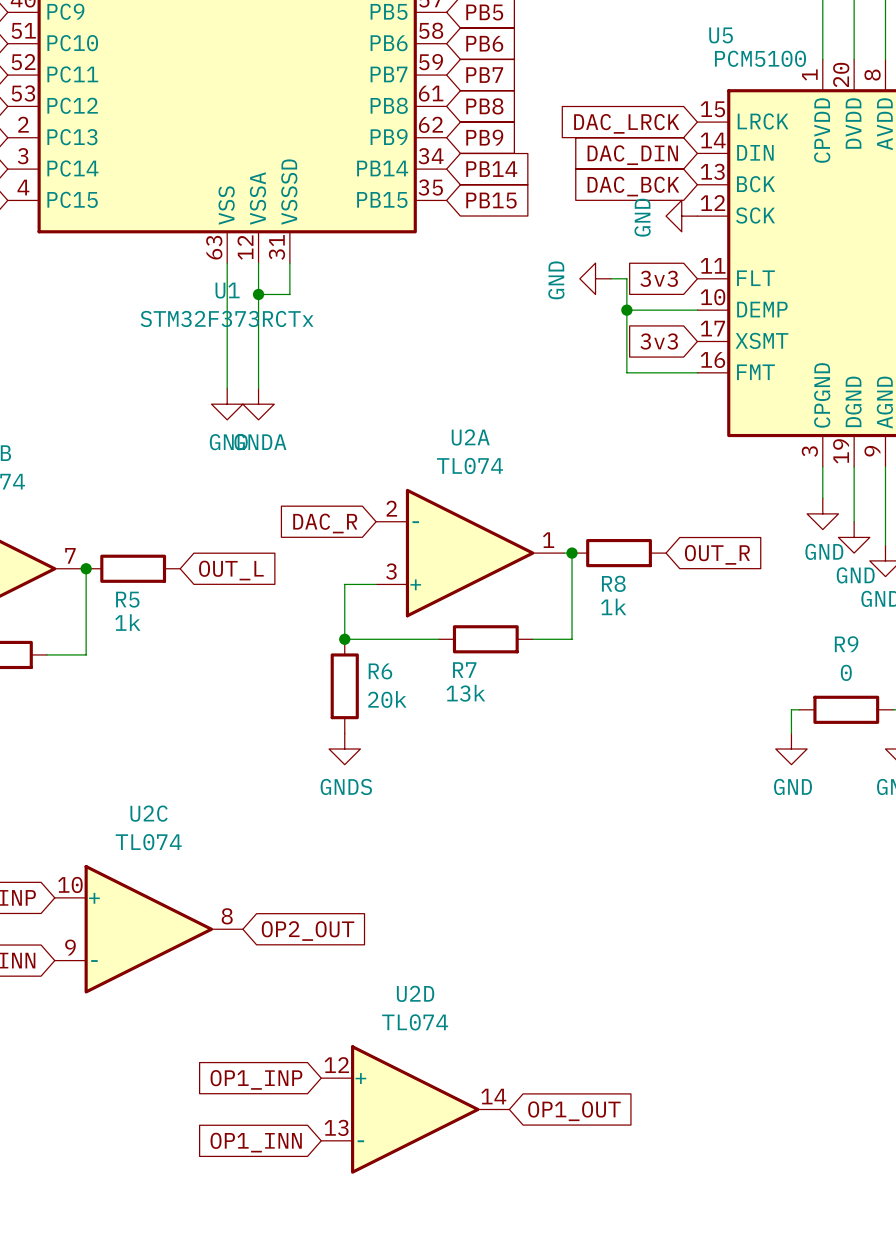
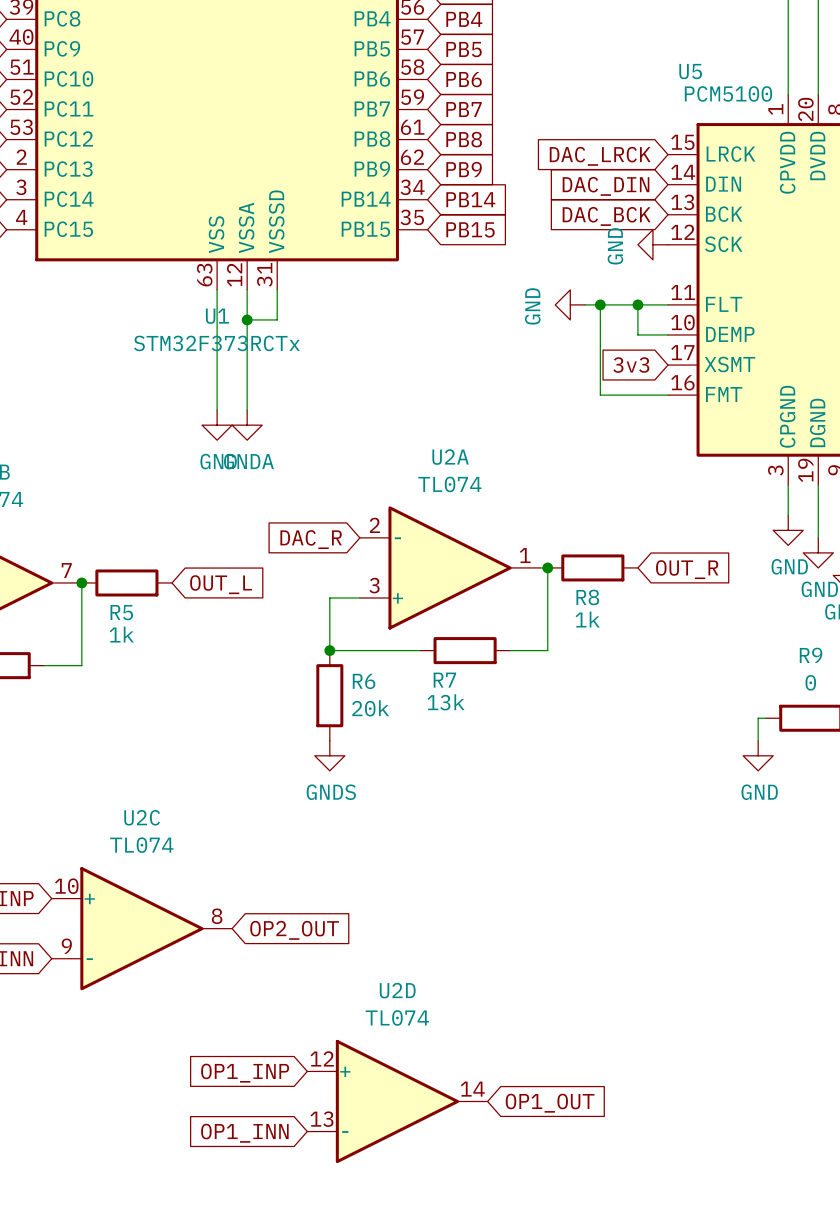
wire: none -> (600, 304) (667, 304)
junction: none -> (600, 304)
global label: 3v3 (659, 278) -> none
junction: none -> (637, 304)
wire: (626, 310) (666, 310) -> (637, 304) (637, 334)
junction: (626, 310) -> none

